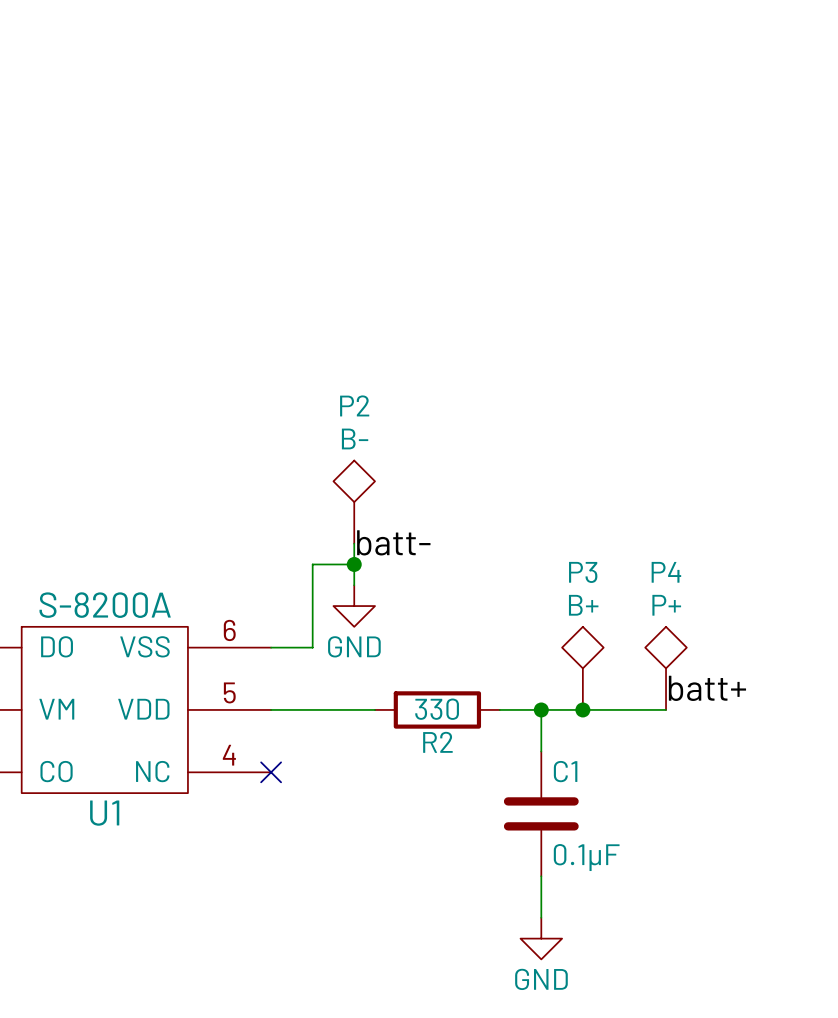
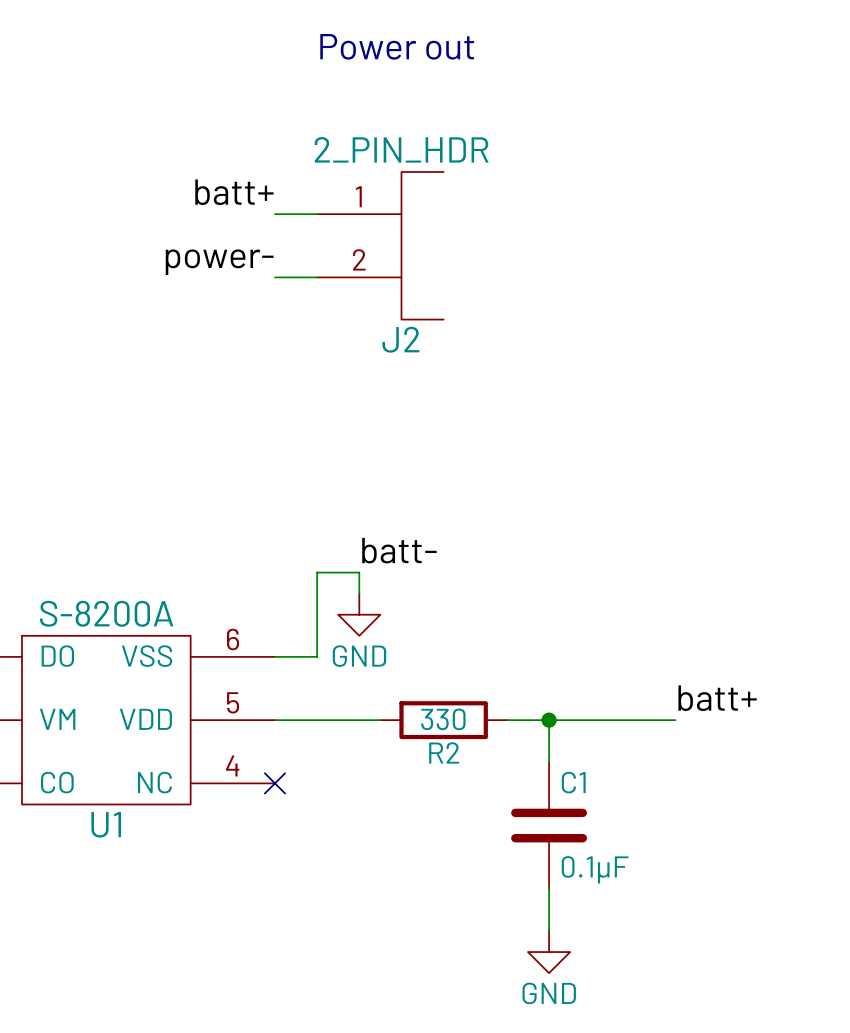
text: none -> Power out (397, 46)
label: none -> batt+ (234, 192)
wire: none -> (274, 214) (317, 214)
J2: none -> 2_PIN_HDR (380, 245)
label: none -> power- (219, 262)
wire: none -> (274, 277) (317, 277)
P2: B- (354, 502) -> none
wire: (354, 543) (354, 564) -> none
junction: (354, 564) -> none
P3: B+ (582, 668) -> none
P4: P+ (666, 668) -> none
junction: (582, 709) -> none

